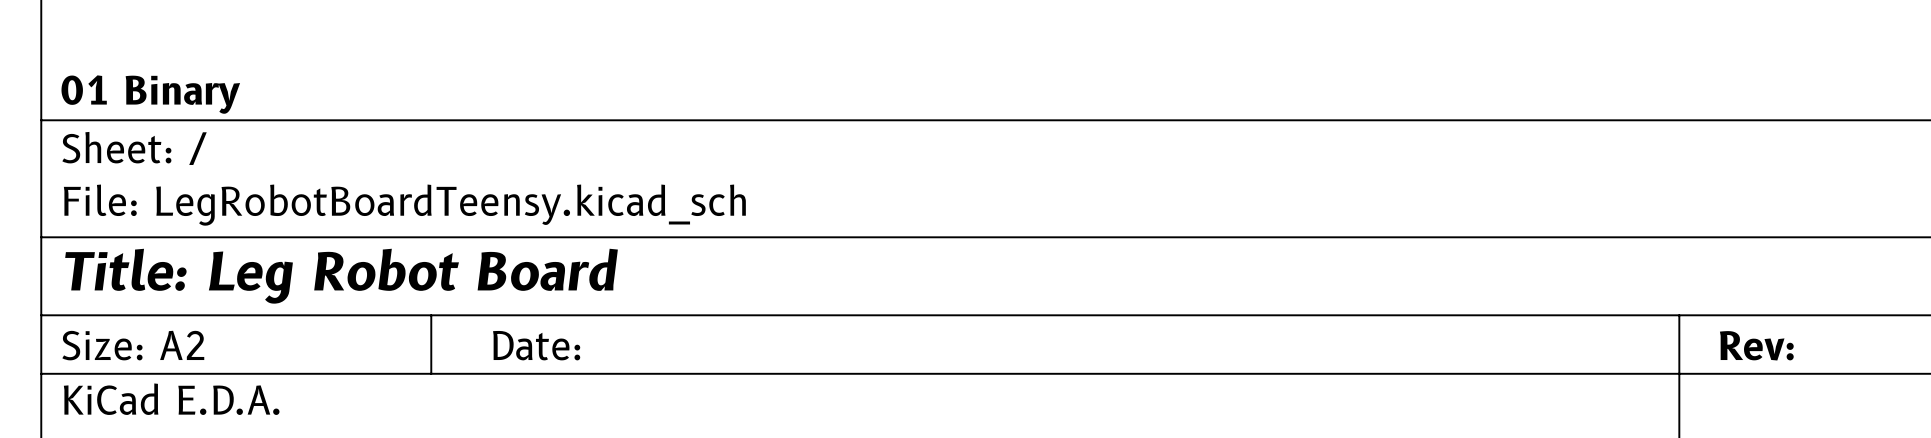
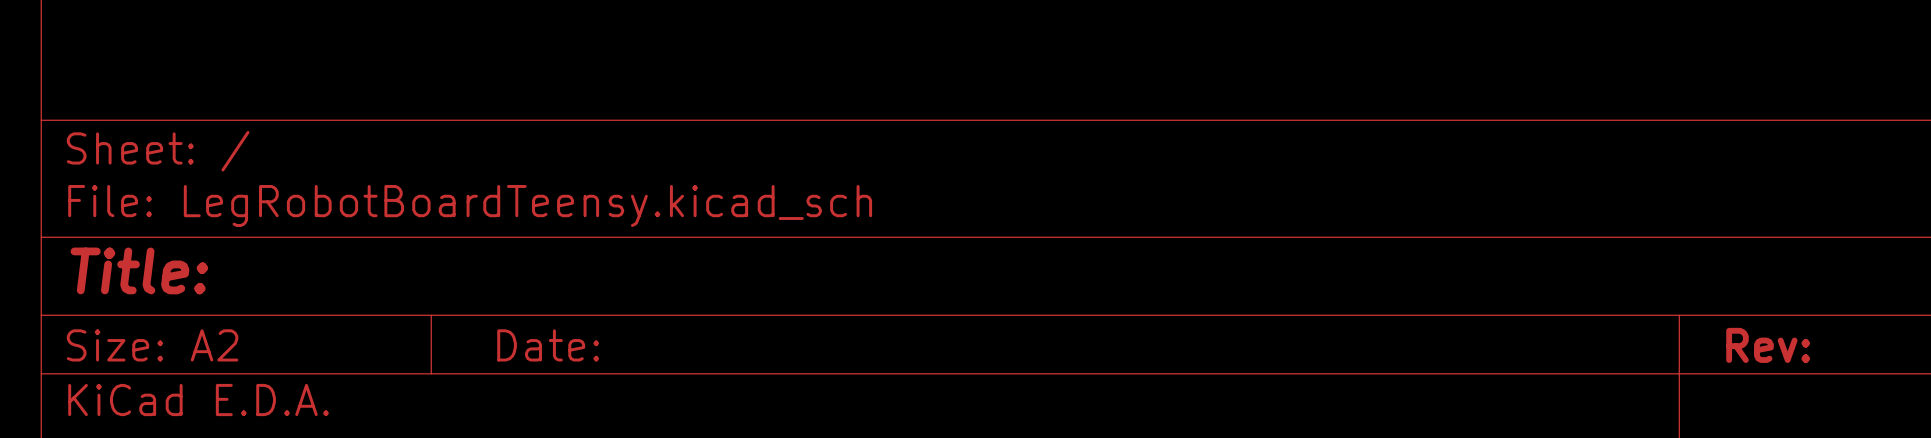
title block: 01 Binary (150, 94) -> none
title block: Title: Leg Robot Board (341, 276) -> Title: (139, 270)

